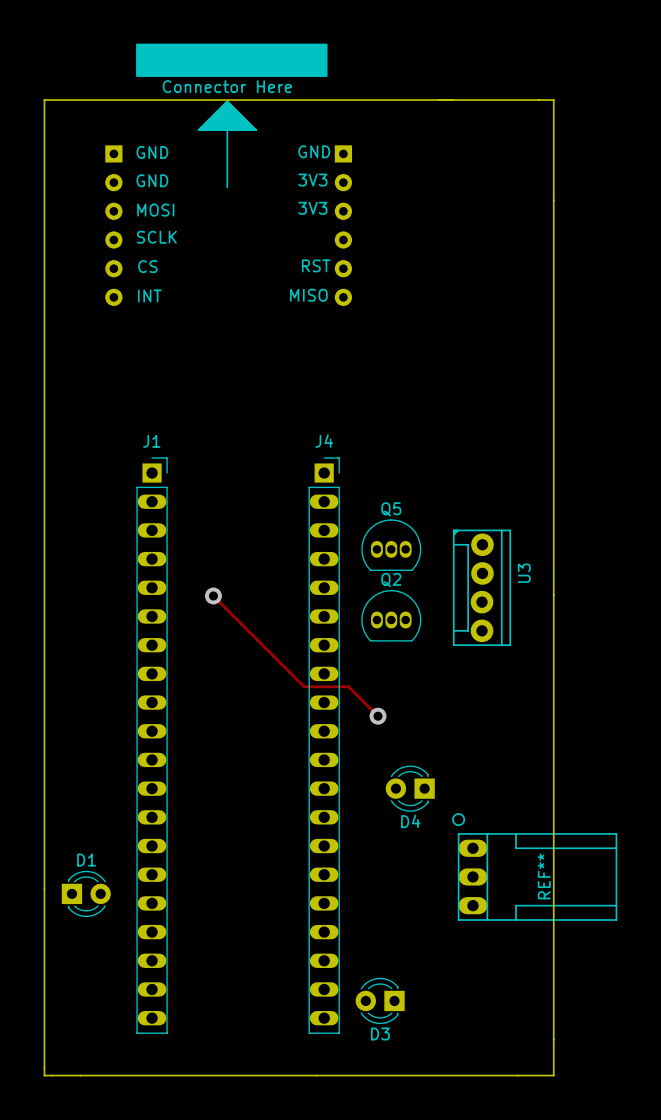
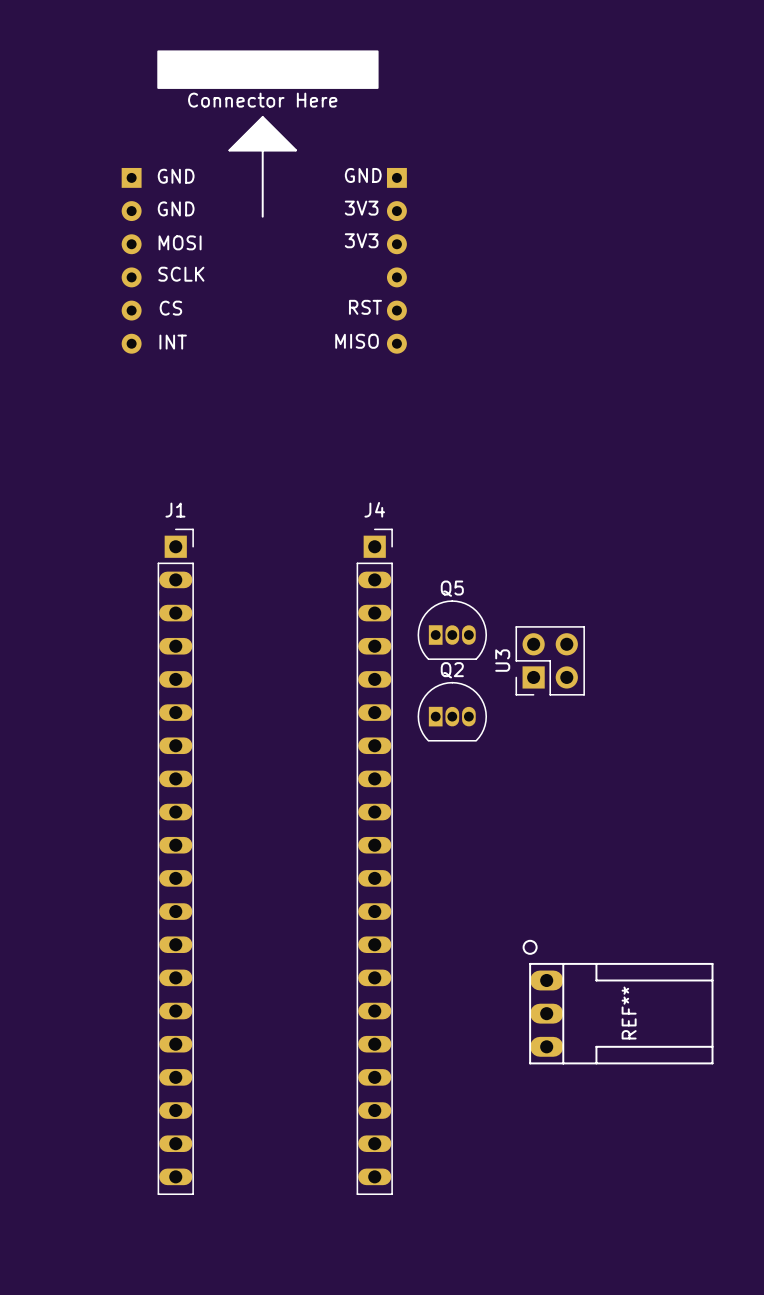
board edge: (44, 100) (553, 100) (553, 1075) (44, 1075) (44, 100) -> none
Q5 footprint: [361, 519, 422, 571] -> [417, 600, 488, 660]
U3 footprint: [452, 529, 512, 647] -> [515, 626, 585, 696]
U3 name position: U3 (524, 573) -> U3 (502, 660)
Q2 footprint: [361, 589, 422, 642] -> [417, 681, 488, 742]
track: (213, 595) (304, 686) (348, 686) (378, 716) -> none
via: (213, 595) -> none
via: (378, 716) -> none
D4: (410, 788) -> none
D1: (86, 893) -> none
D3: (380, 1000) -> none

